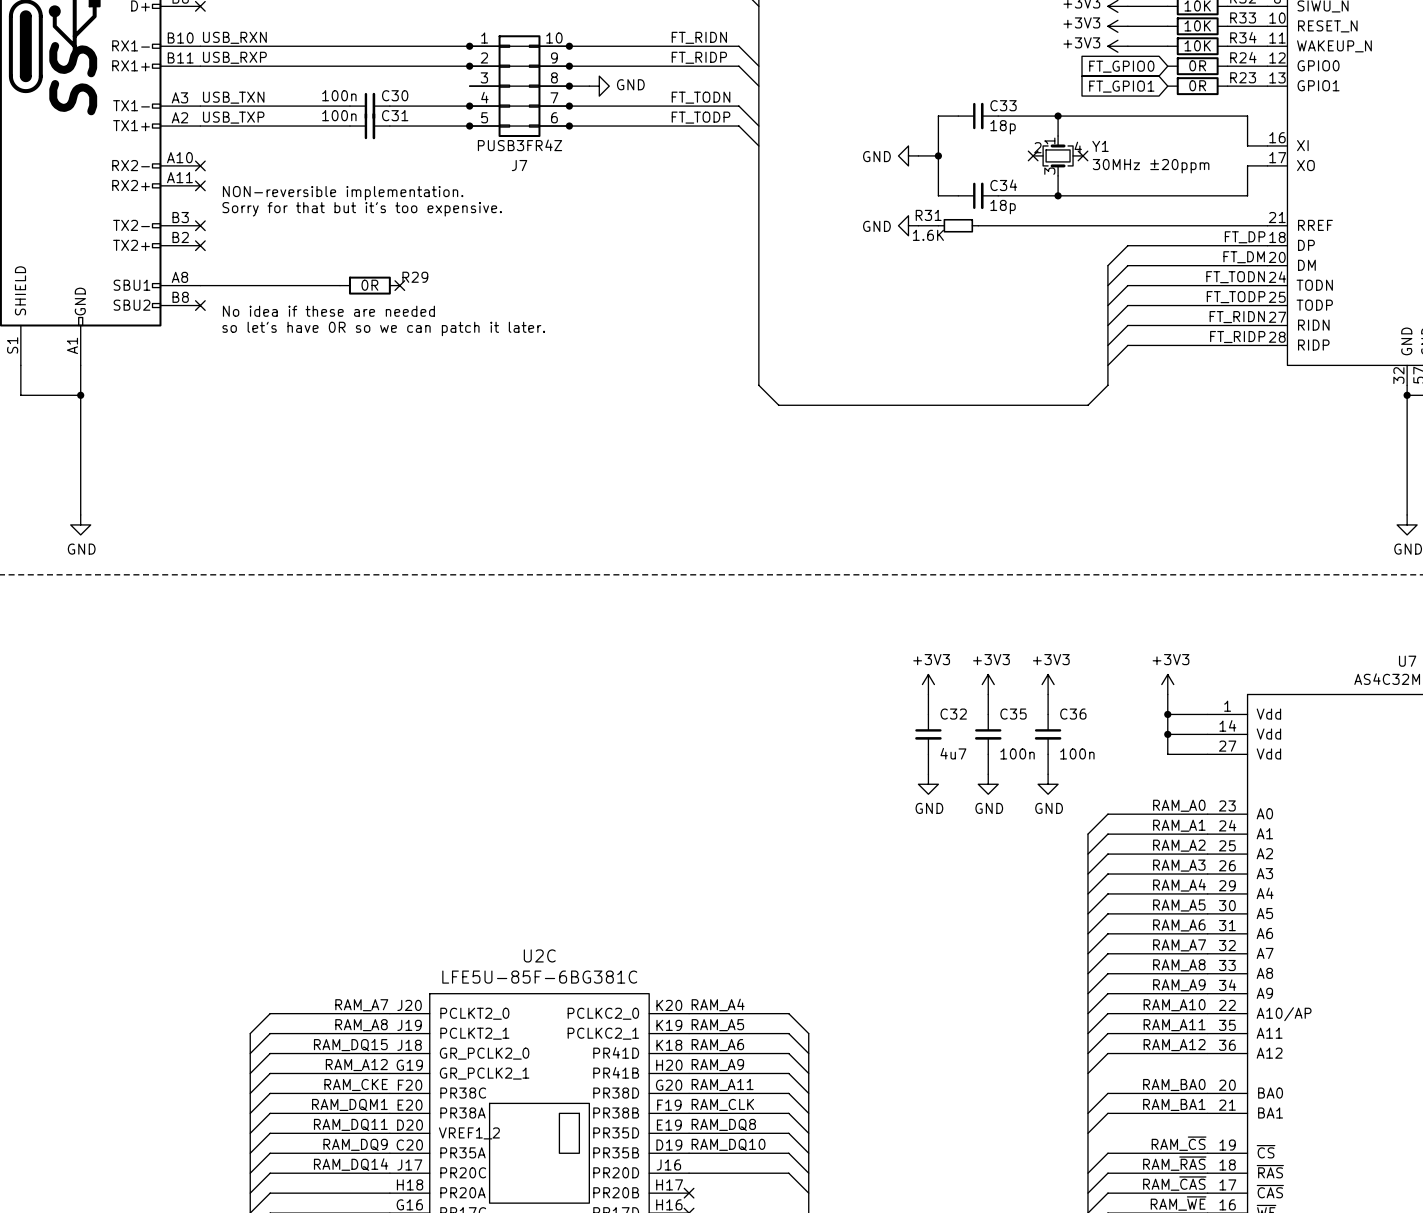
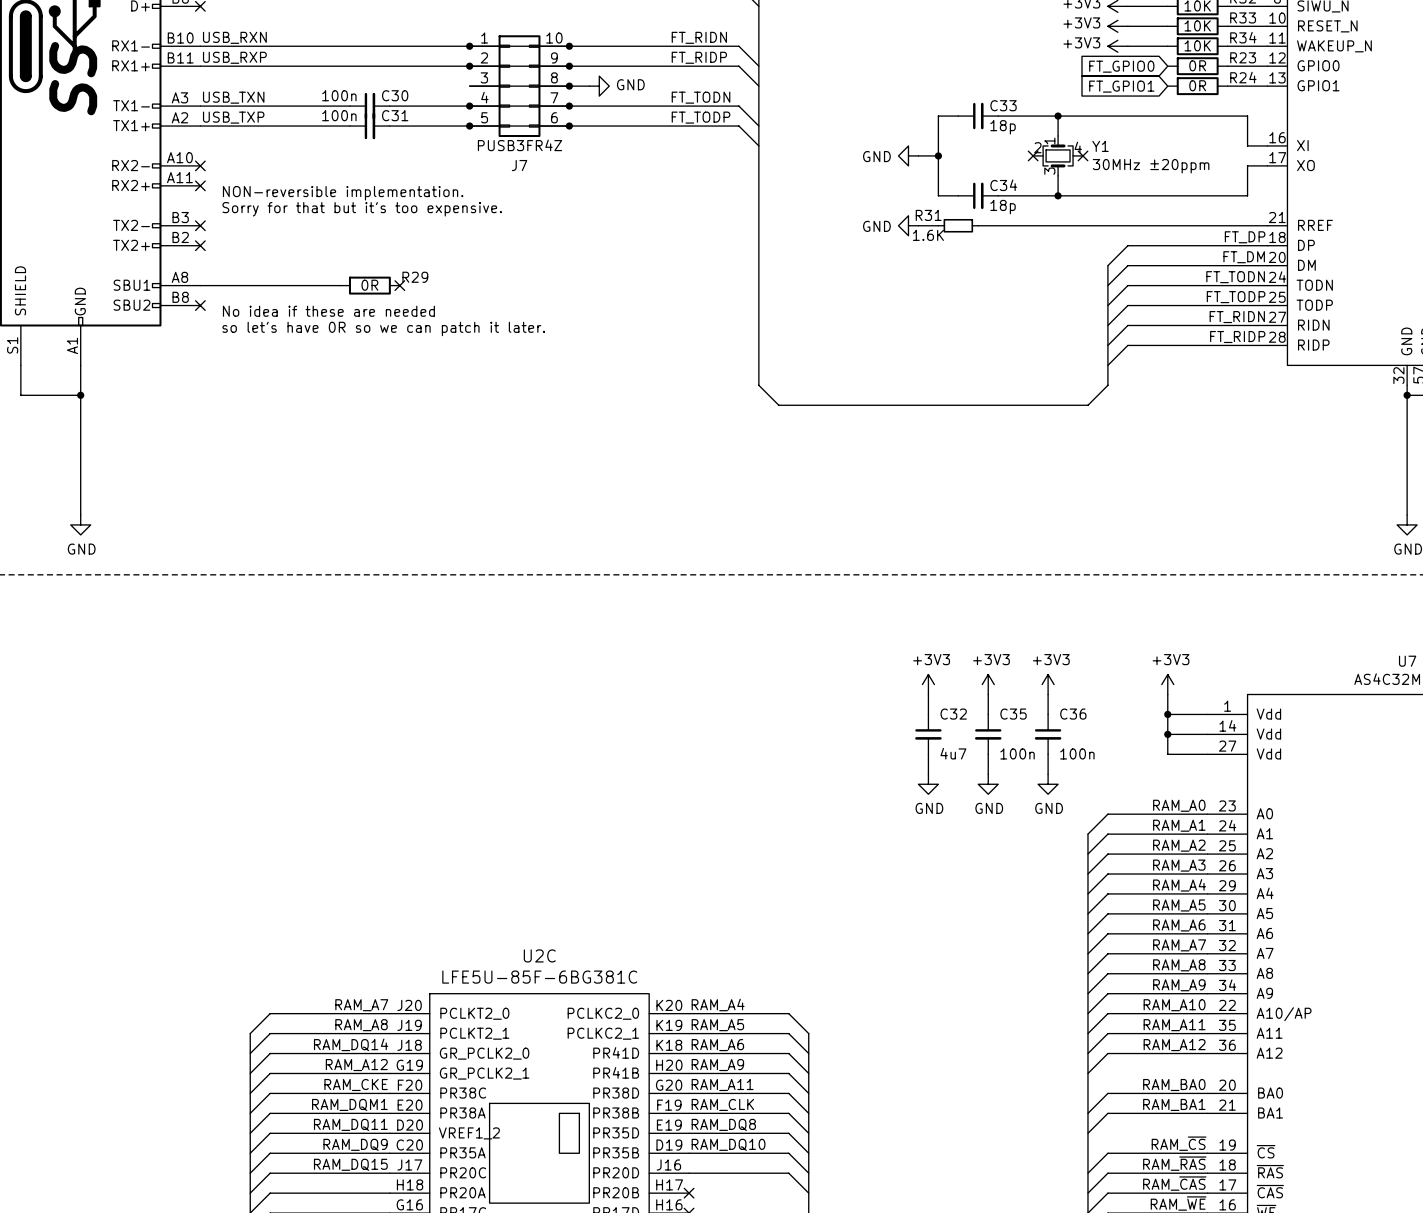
R24 name: R24 (1243, 57) -> R23 (1243, 57)
R23 name: R23 (1243, 77) -> R24 (1243, 77)
label: RAM_DQ15 (350, 1045) -> RAM_DQ14 (351, 1044)
label: RAM_DQ14 (351, 1164) -> RAM_DQ15 (350, 1164)

